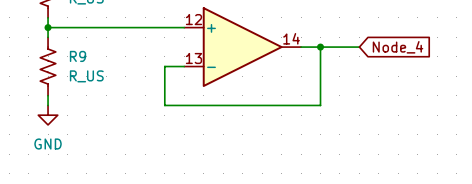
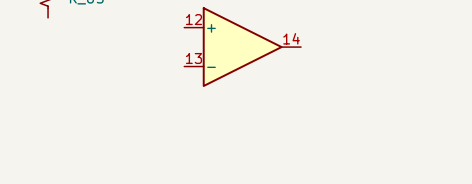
wire: (48, 17) (48, 37) -> none
wire: (48, 27) (184, 27) -> none
junction: (48, 27) -> none
wire: (301, 47) (359, 47) -> none
wire: (320, 47) (320, 105) (164, 105) (164, 66) (184, 66) -> none
junction: (320, 47) -> none
global label: Node_4 (398, 47) -> none
R9: R_US (48, 66) -> none
wire: (48, 95) (48, 105) -> none
power symbol: GND (48, 115) -> none

